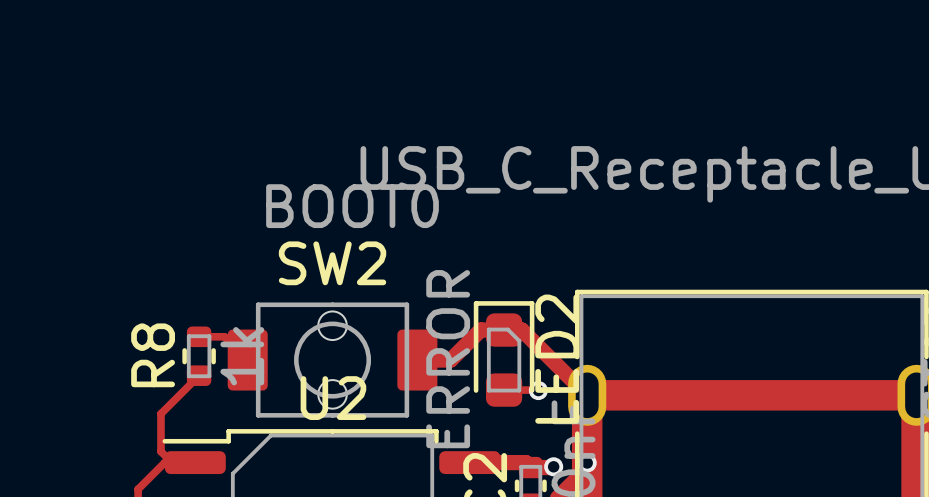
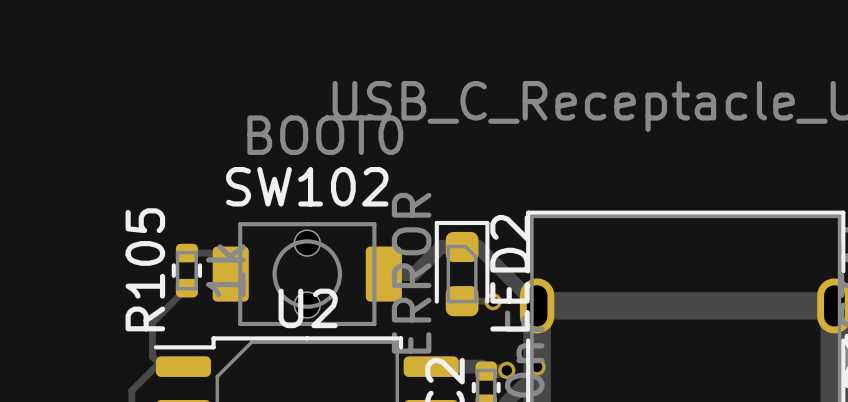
SW2 name: SW2 (332, 263) -> SW102 (307, 186)
R8 name: R8 (153, 355) -> R105 (145, 269)

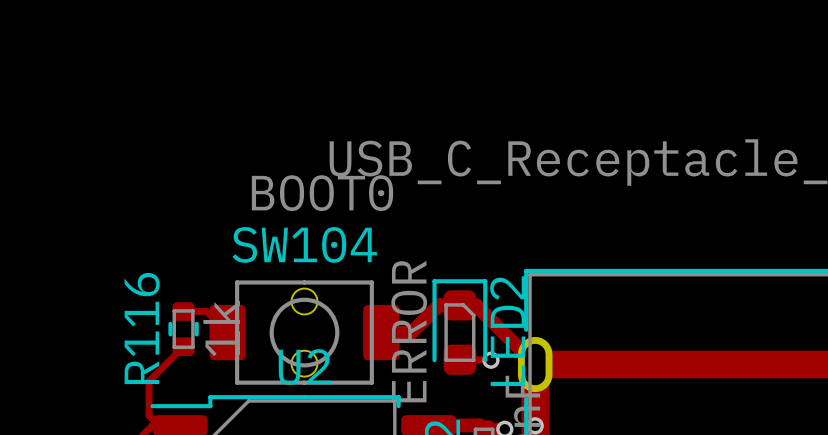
SW102 name: SW102 (307, 186) -> SW104 (304, 244)
R105 name: R105 (145, 269) -> R116 (142, 328)

